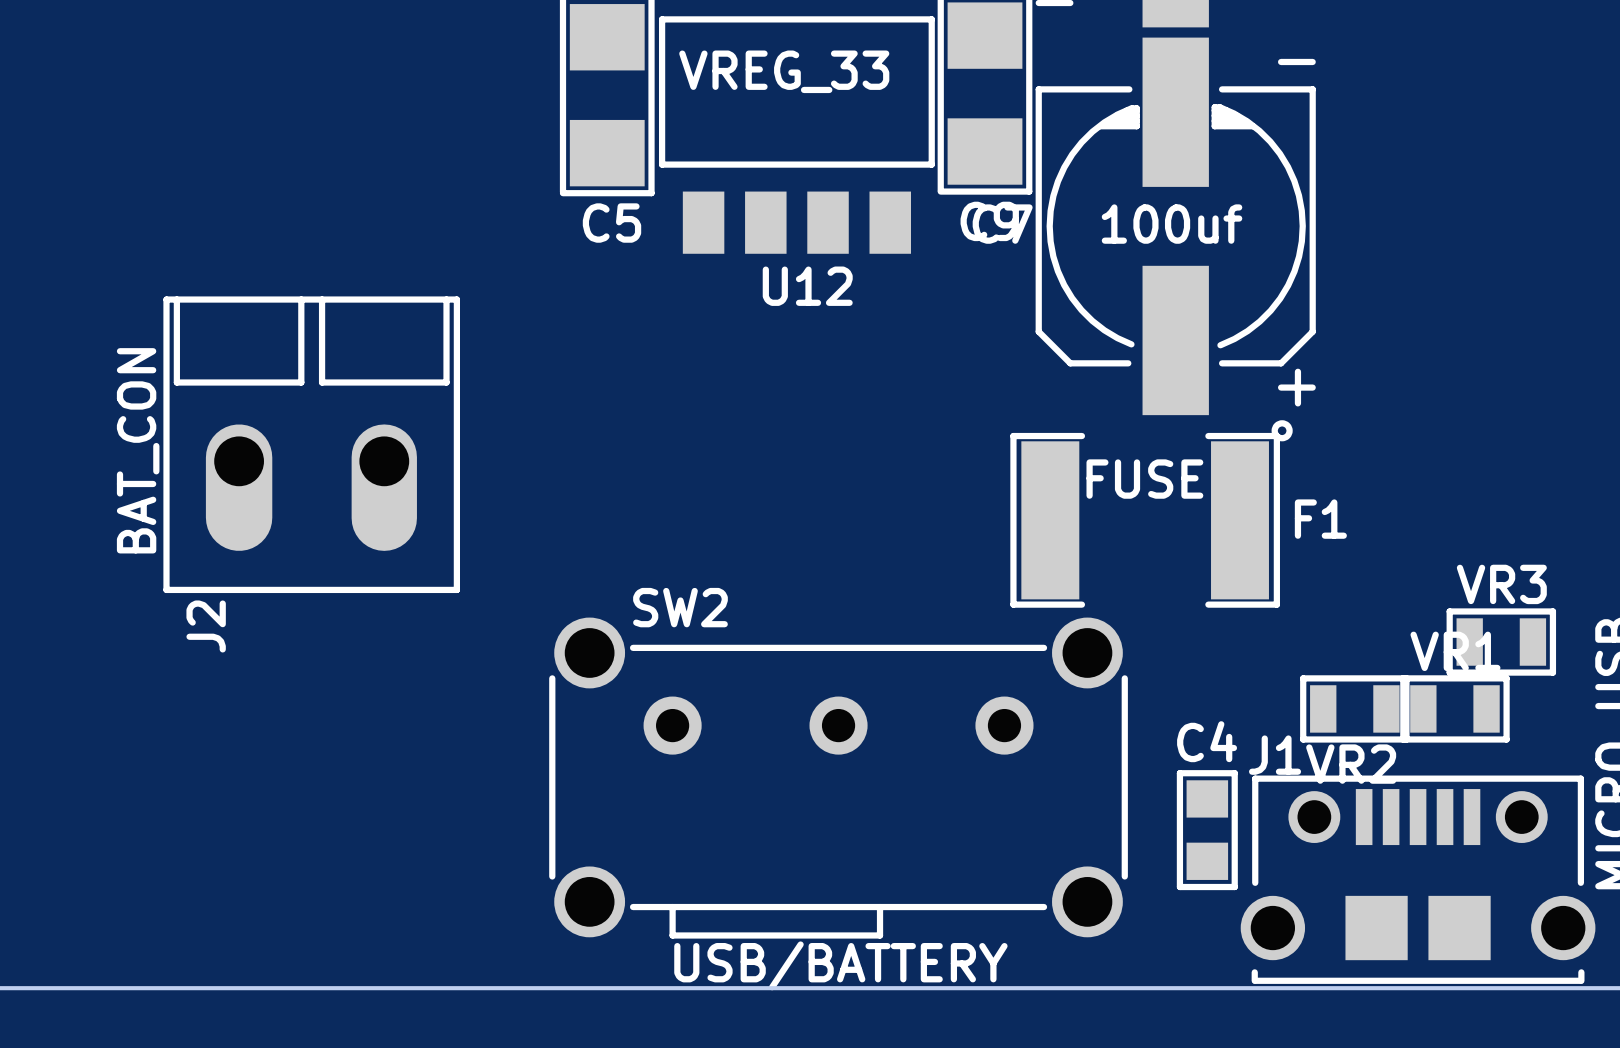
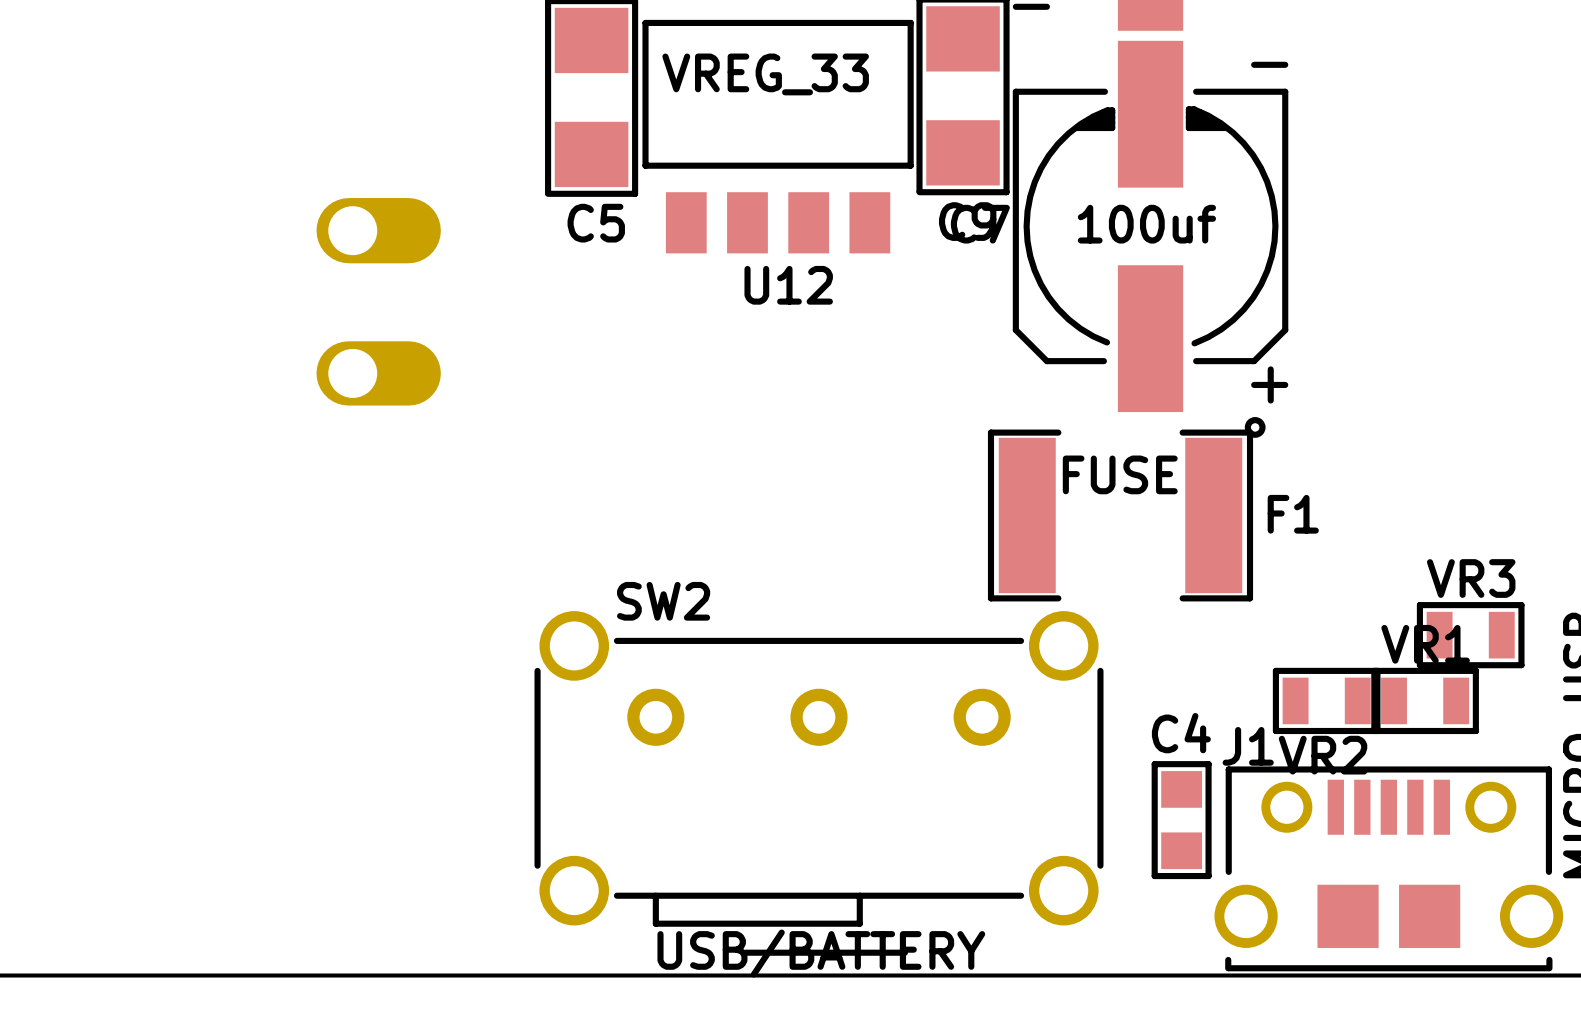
J2 side: top (311, 444) -> bottom (378, 301)
SW2 footprint: [549, 617, 1128, 939] -> [534, 611, 1104, 956]

